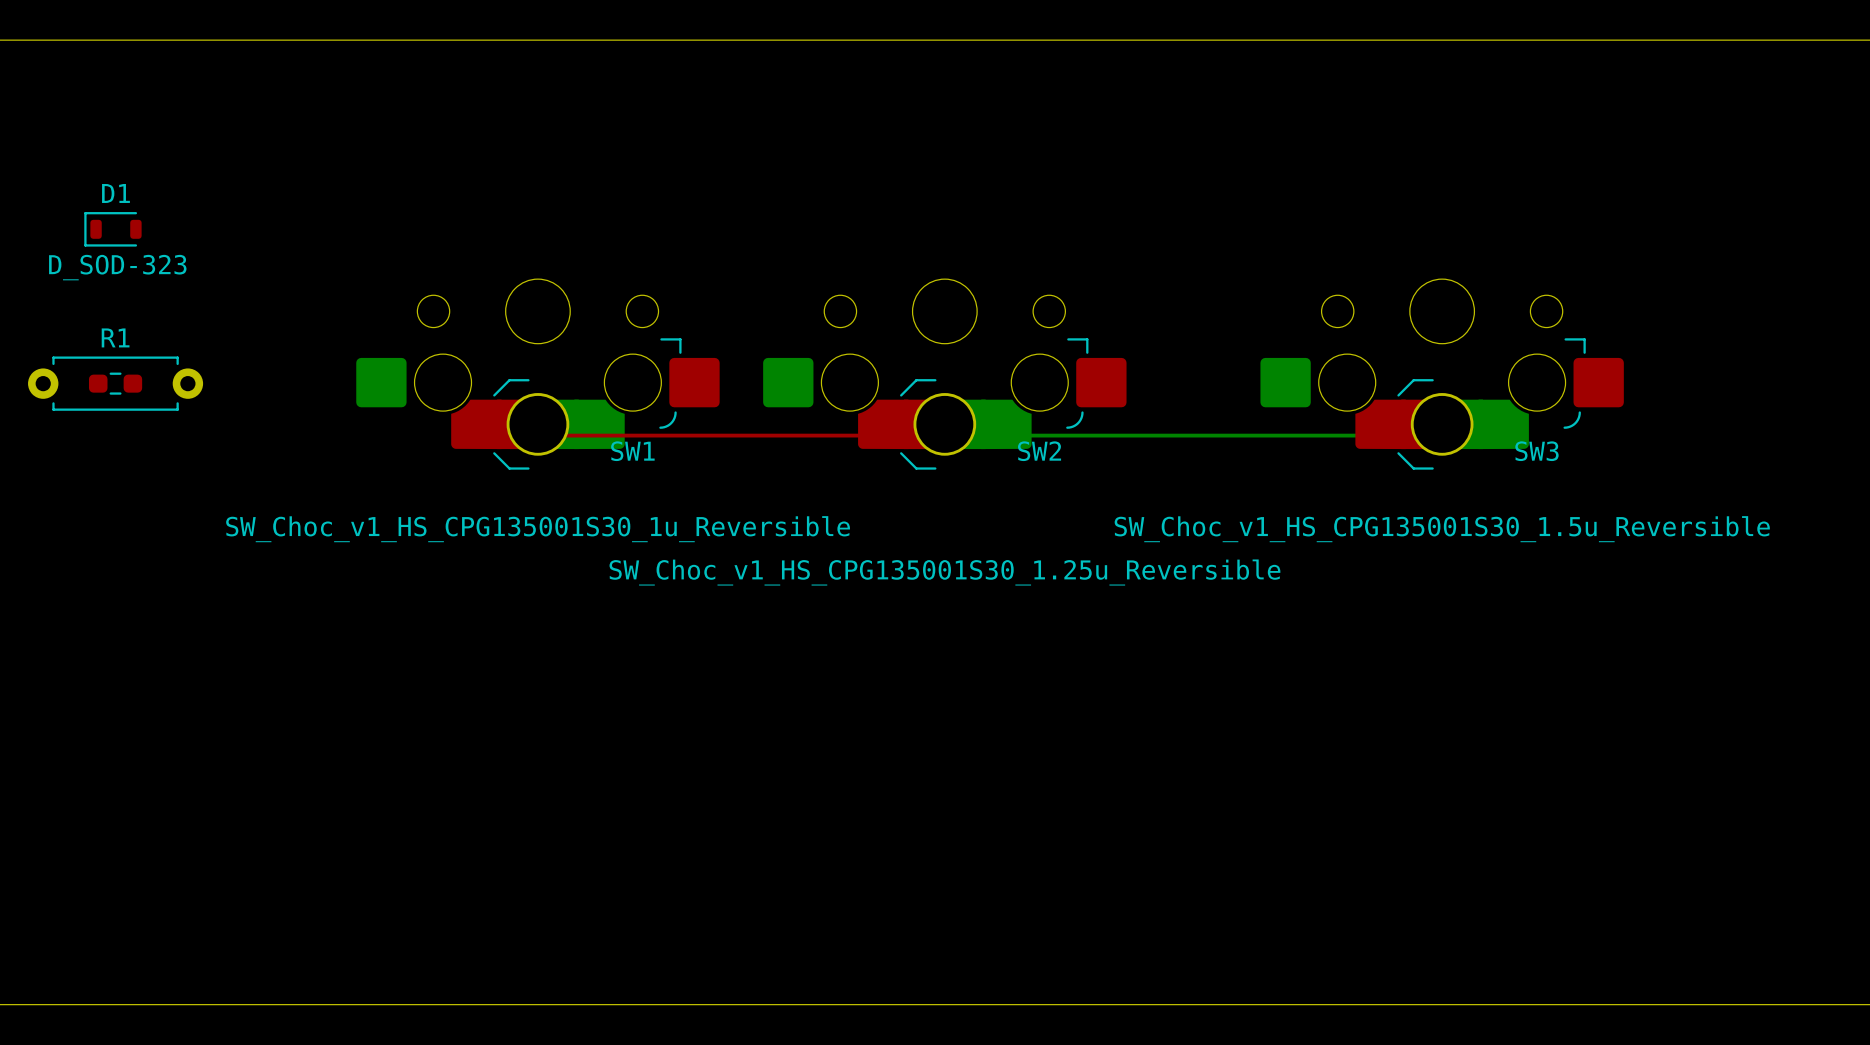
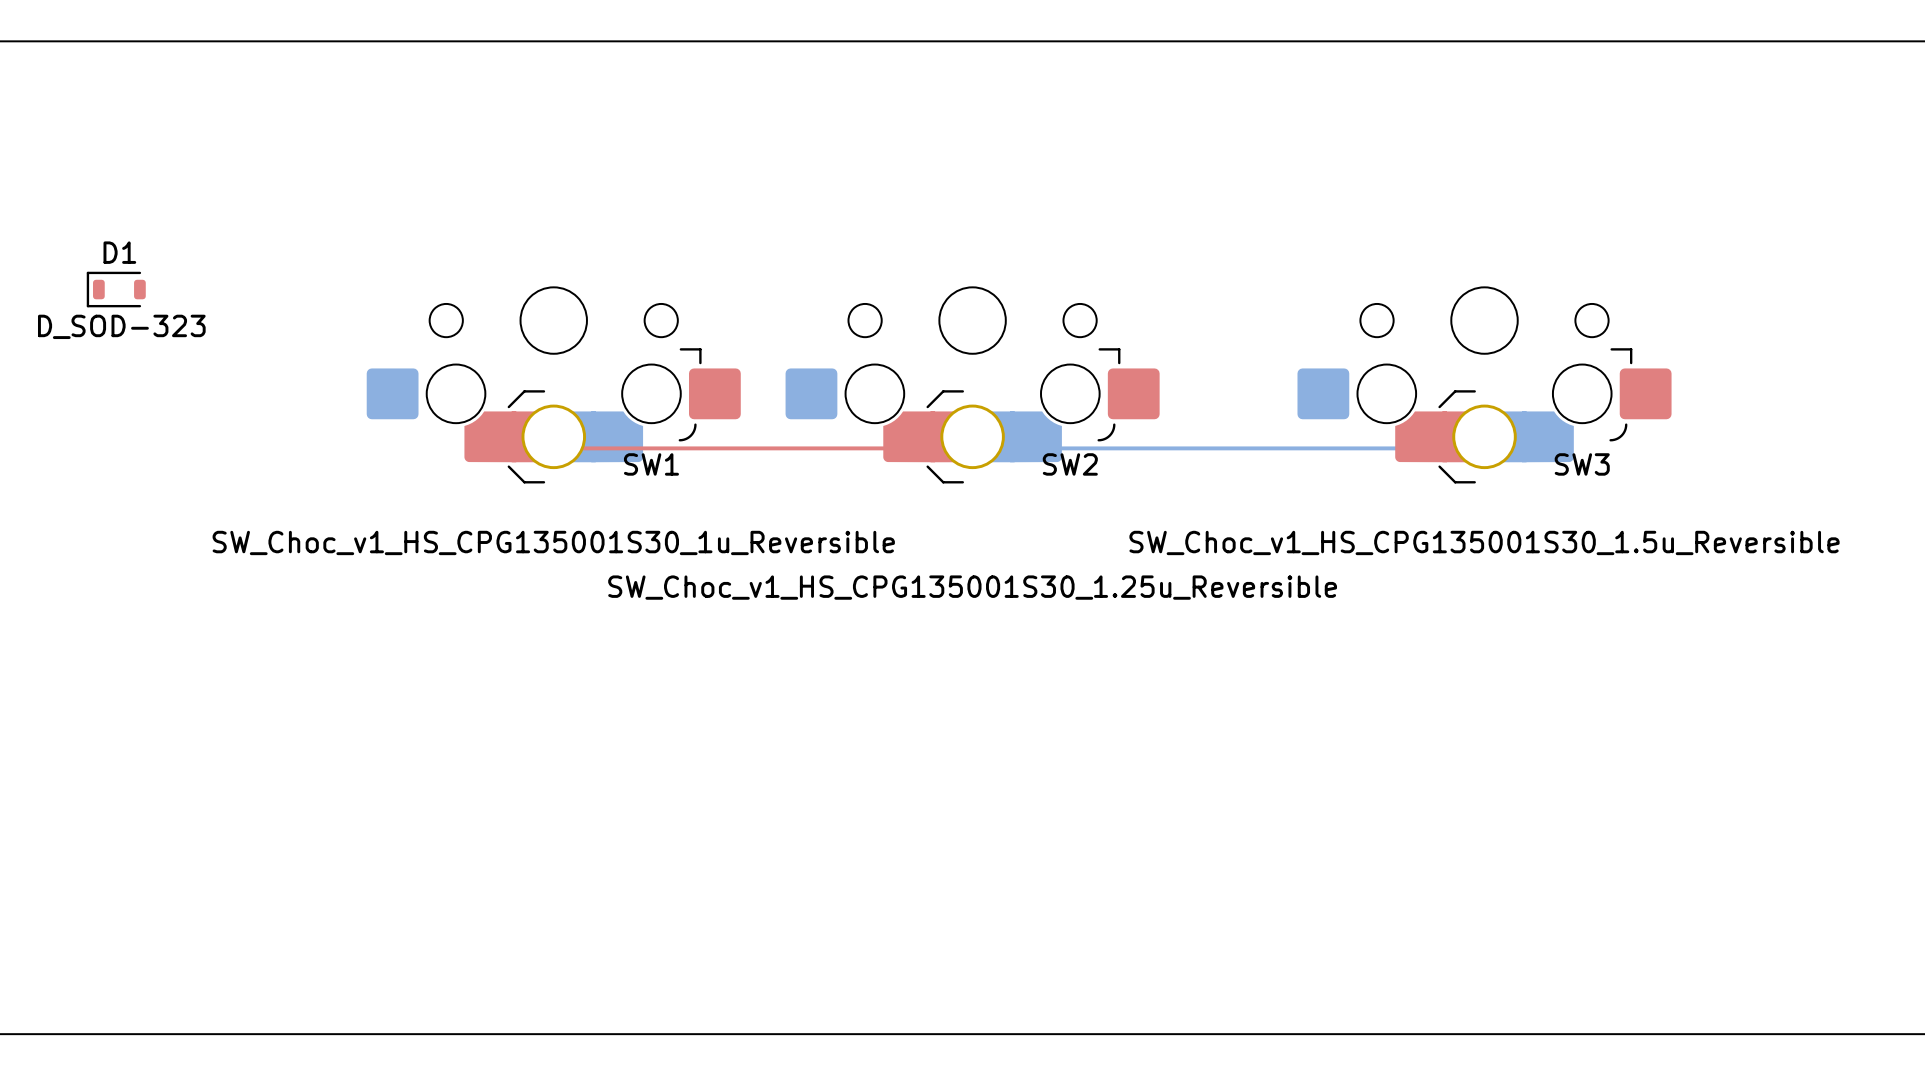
D1 position: (112, 229) -> (116, 289)
R1: (115, 383) -> none

